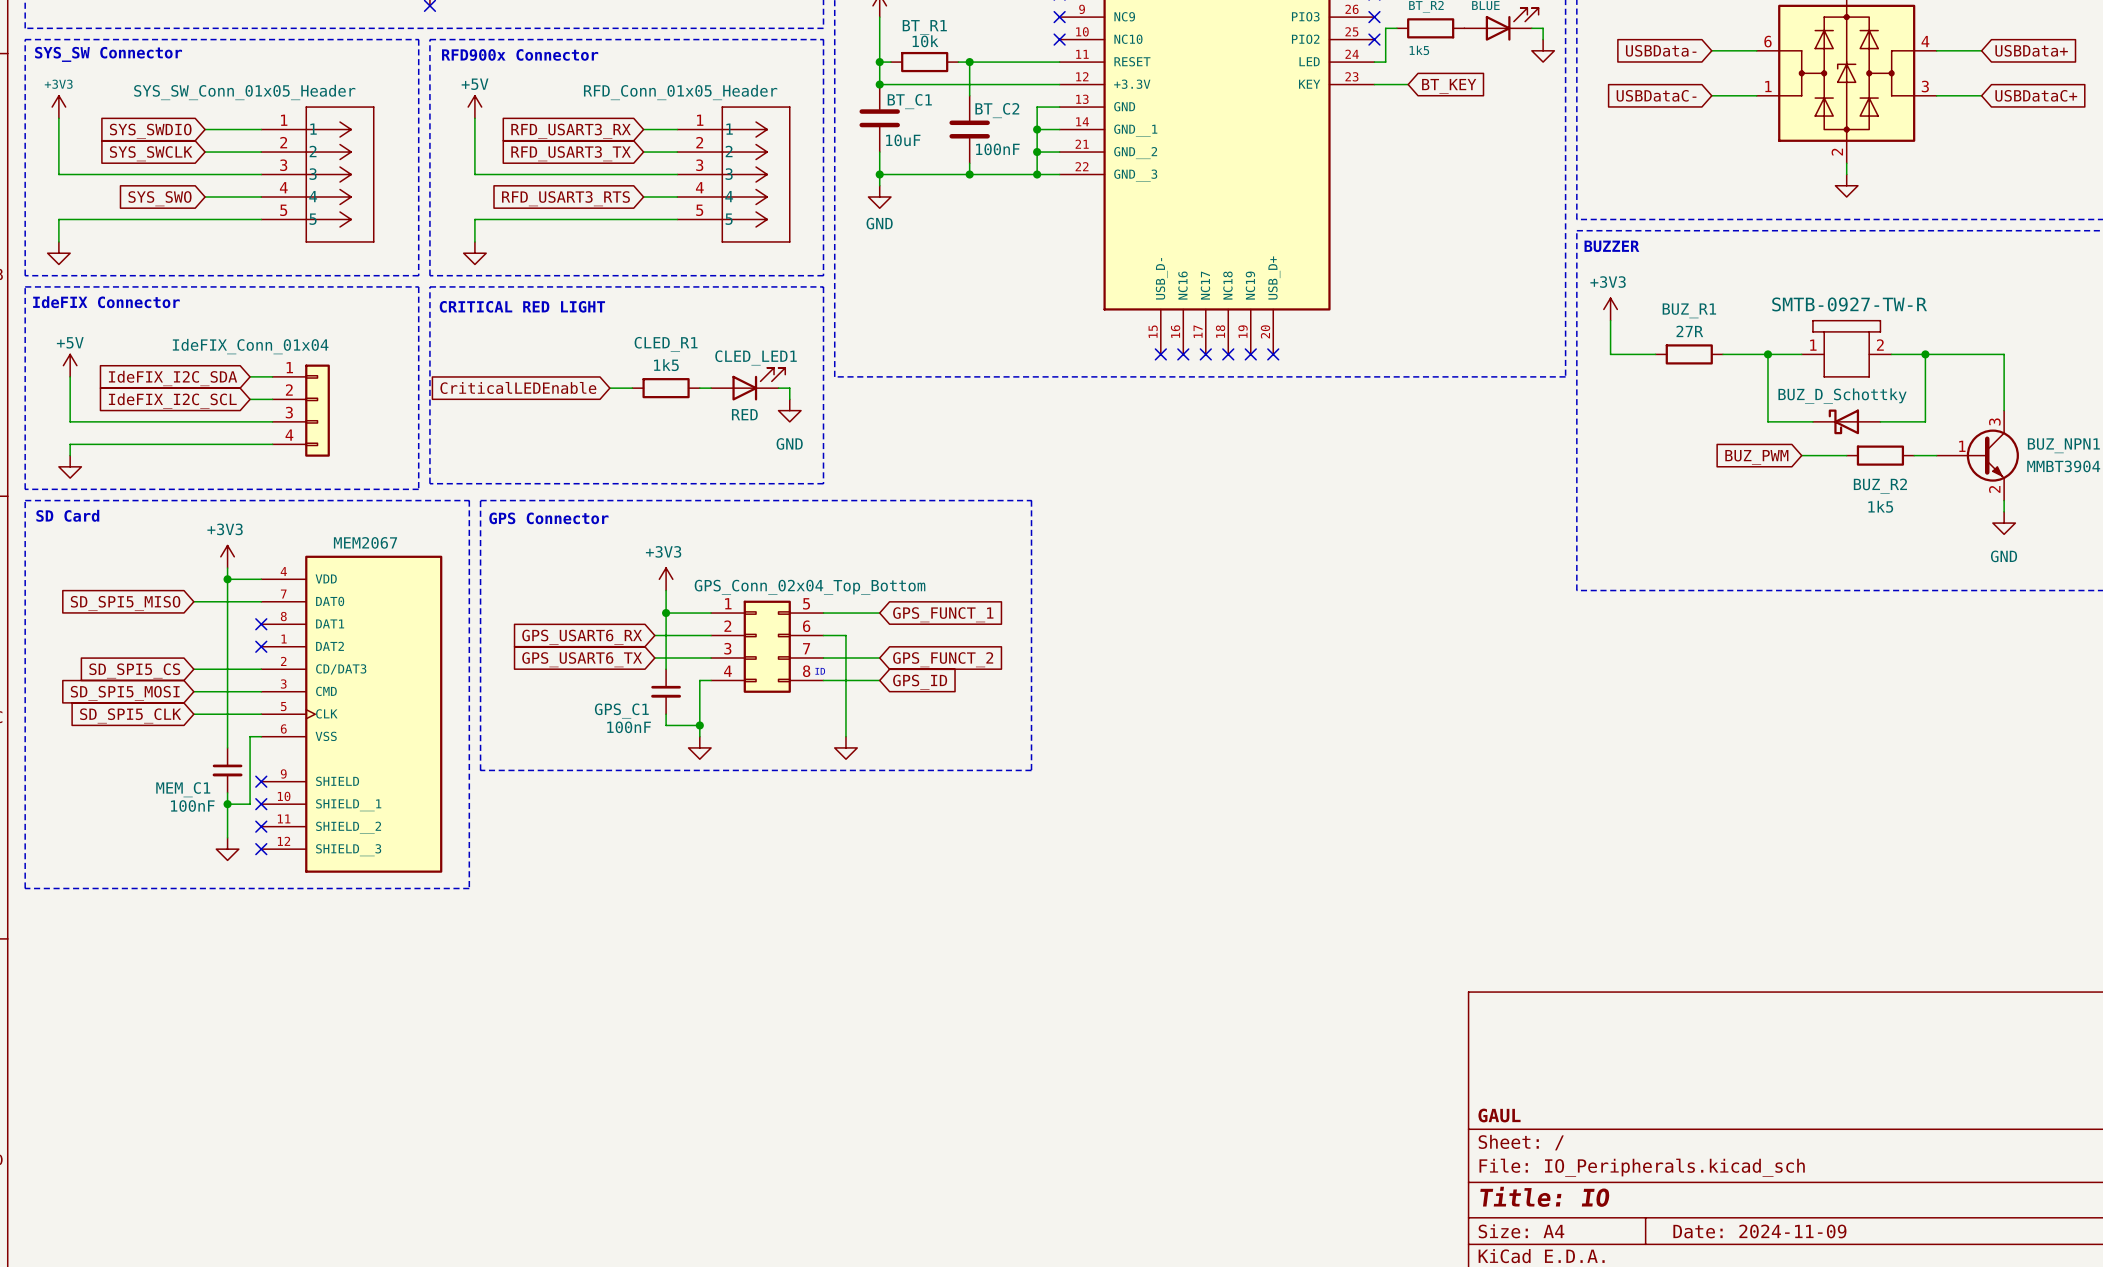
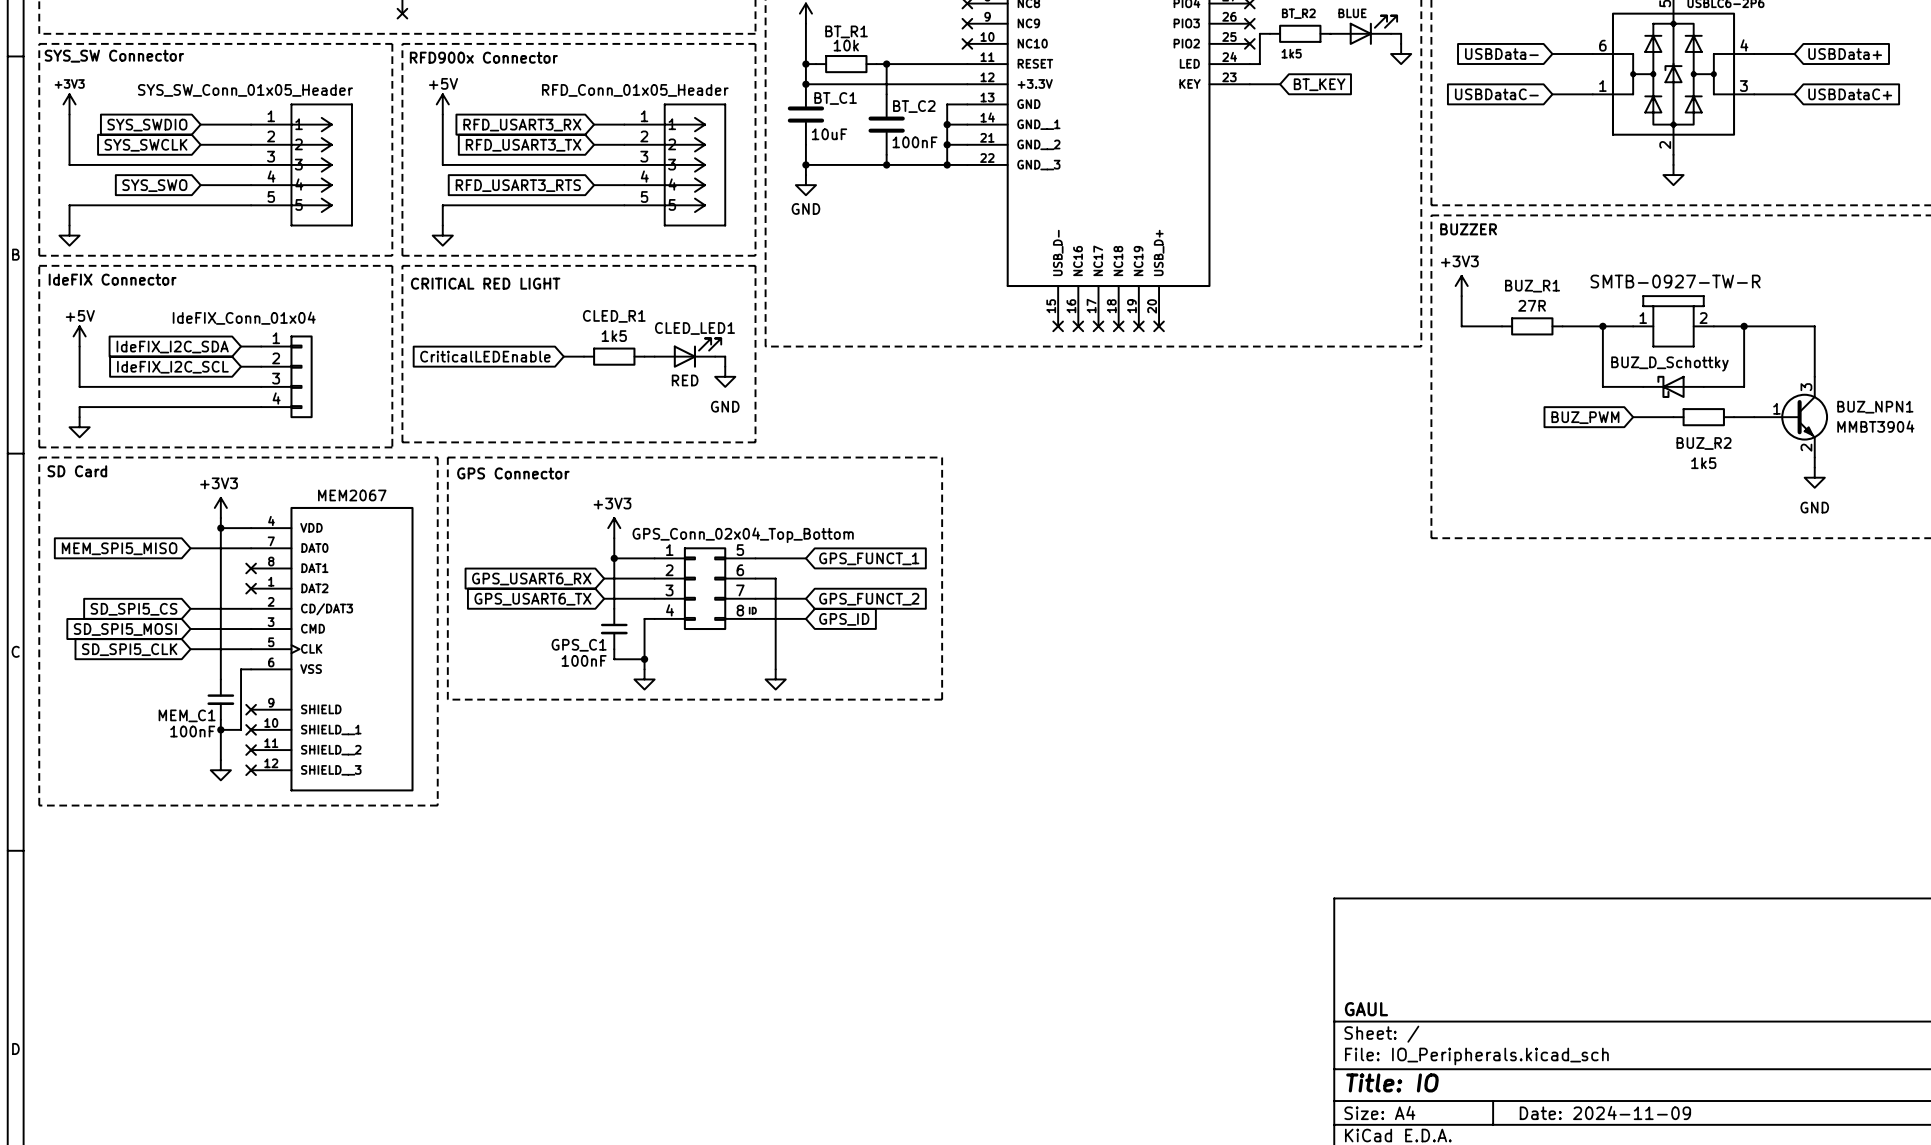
global label: SD_SPI5_MISO (125, 603) -> MEM_SPI5_MISO (119, 548)

